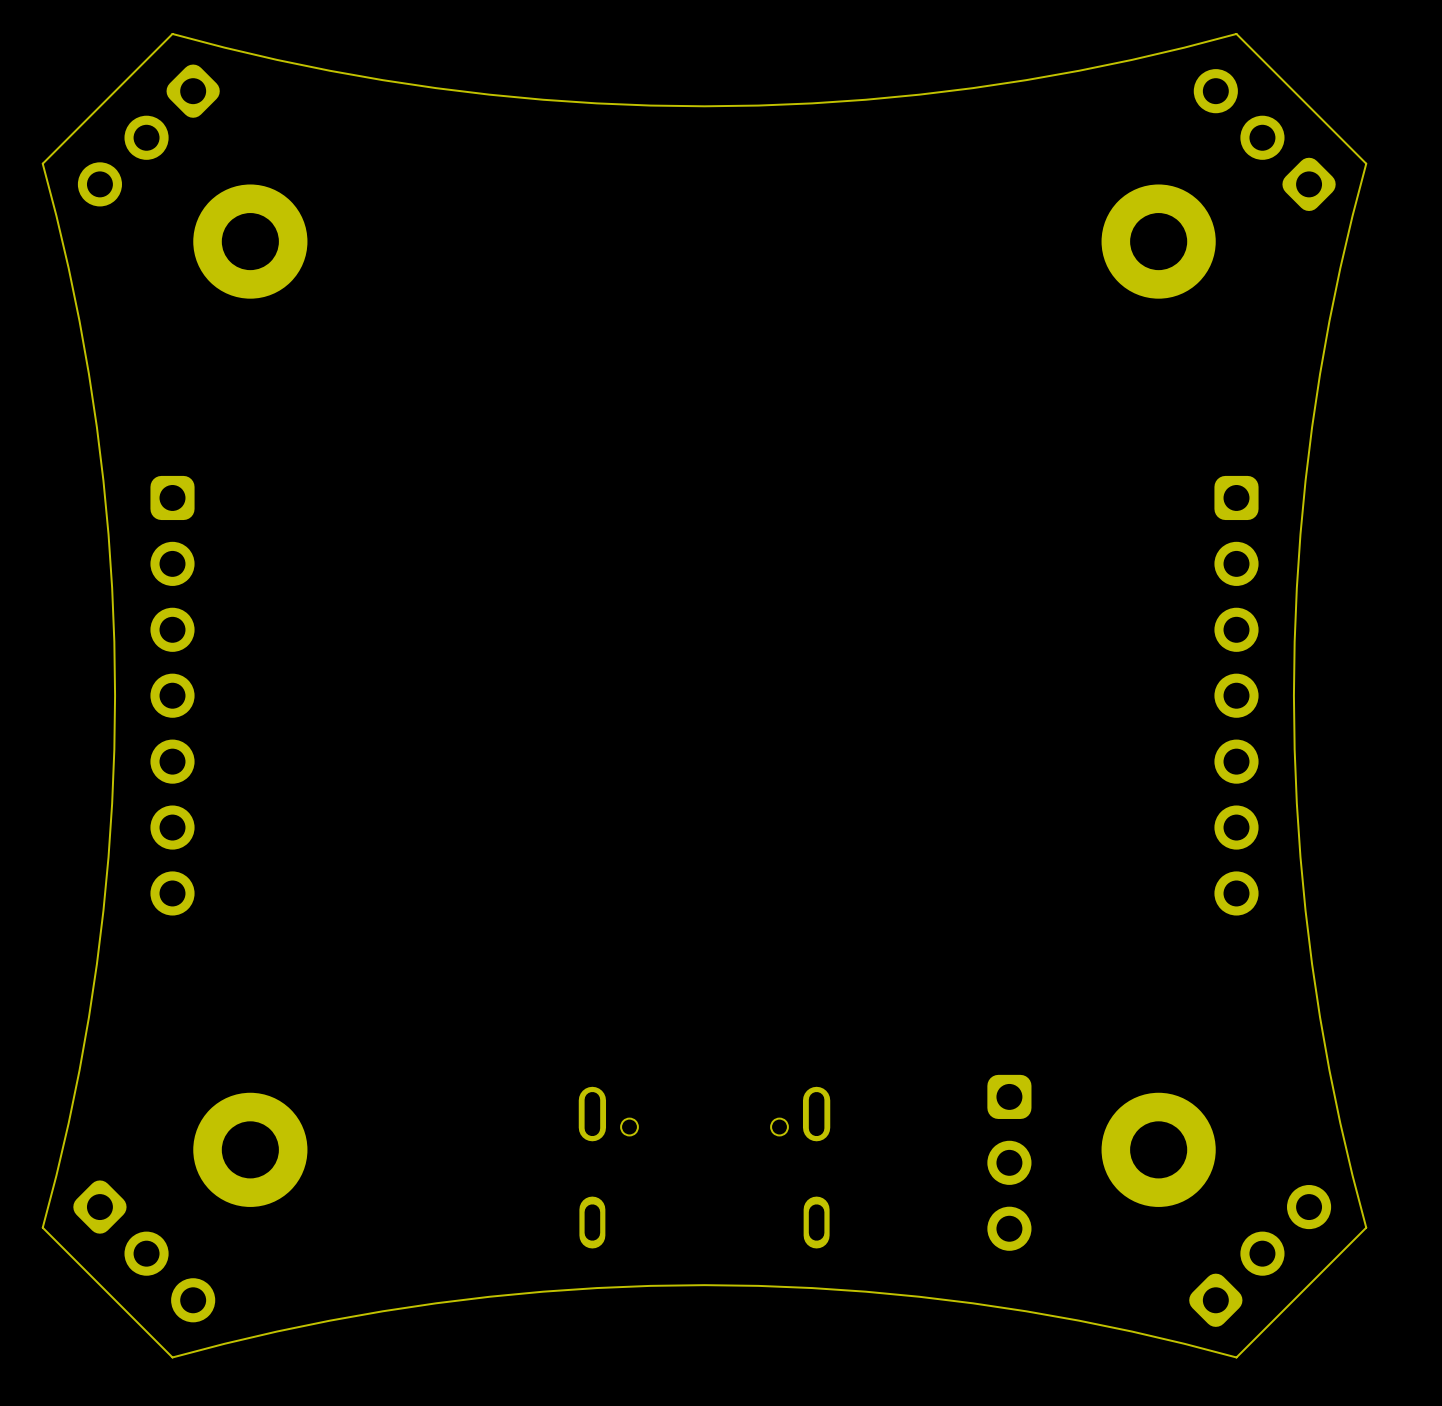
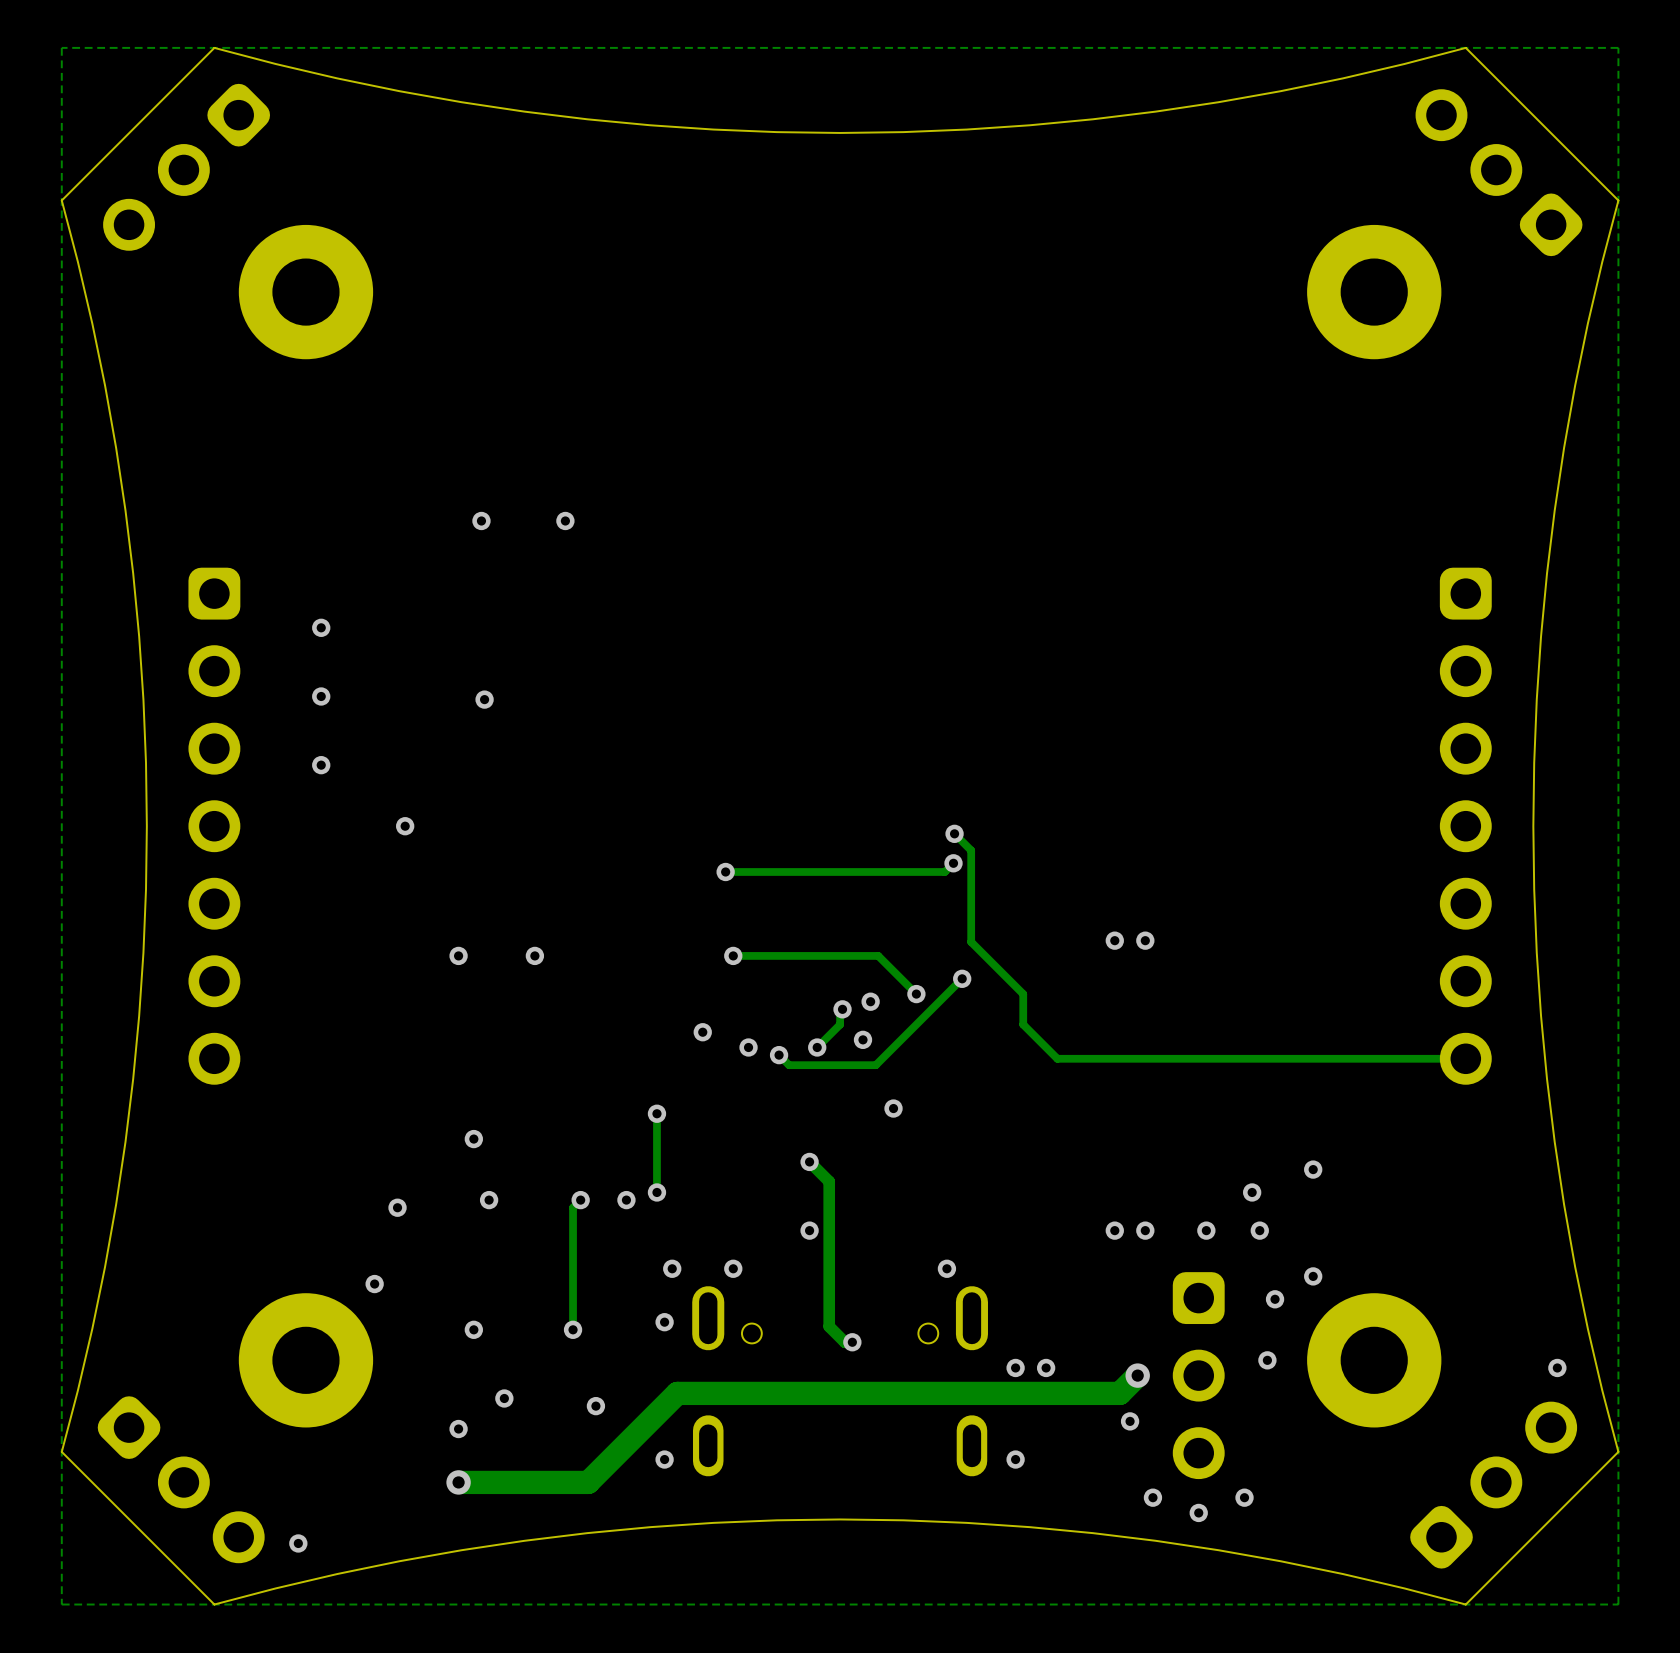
zone outline: none -> (1618, 47) (1618, 1604) (61, 1604) (61, 47) (1618, 47)
via: none -> (481, 520)
via: none -> (565, 520)
via: none -> (321, 627)
via: none -> (321, 696)
via: none -> (484, 699)
via: none -> (321, 765)
via: none -> (405, 826)
track: none -> (954, 833) (971, 850) (971, 942) (1023, 994) (1023, 1024) (1057, 1058) (1465, 1058)
via: none -> (954, 833)
track: none -> (953, 863) (944, 871) (725, 871)
via: none -> (953, 863)
via: none -> (725, 871)
via: none -> (1114, 940)
via: none -> (1145, 940)
via: none -> (458, 955)
via: none -> (534, 955)
track: none -> (733, 955) (878, 955) (916, 994)
via: none -> (733, 955)
track: none -> (962, 978) (875, 1065) (789, 1065) (779, 1055)
via: none -> (962, 978)
via: none -> (916, 994)
via: none -> (870, 1001)
track: none -> (842, 1009) (840, 1011) (840, 1024) (817, 1047)
via: none -> (842, 1009)
via: none -> (702, 1032)
via: none -> (862, 1039)
via: none -> (748, 1047)
via: none -> (817, 1047)
via: none -> (779, 1055)
via: none -> (893, 1108)
track: none -> (656, 1113) (656, 1192)
via: none -> (656, 1113)
via: none -> (473, 1139)
track: none -> (809, 1161) (829, 1181) (829, 1326) (844, 1342) (852, 1342)
via: none -> (809, 1161)
via: none -> (1313, 1169)
via: none -> (656, 1192)
via: none -> (1252, 1192)
via: none -> (489, 1200)
track: none -> (580, 1200) (573, 1207) (573, 1329)
via: none -> (580, 1200)
via: none -> (626, 1200)
via: none -> (397, 1207)
via: none -> (809, 1230)
via: none -> (1114, 1230)
via: none -> (1145, 1230)
via: none -> (1206, 1230)
via: none -> (1259, 1230)
via: none -> (672, 1268)
via: none -> (733, 1268)
via: none -> (946, 1268)
via: none -> (1313, 1276)
via: none -> (374, 1284)
via: none -> (1275, 1299)
via: none -> (664, 1322)
via: none -> (473, 1329)
via: none -> (573, 1329)
via: none -> (852, 1342)
via: none -> (1267, 1360)
via: none -> (1015, 1367)
via: none -> (1046, 1367)
via: none -> (1557, 1367)
track: none -> (1137, 1375) (1119, 1393) (677, 1393) (588, 1482) (458, 1482)
via: none -> (1137, 1375)
via: none -> (504, 1398)
via: none -> (595, 1406)
via: none -> (1130, 1421)
via: none -> (458, 1429)
via: none -> (664, 1459)
via: none -> (1015, 1459)
via: none -> (458, 1482)
via: none -> (1152, 1497)
via: none -> (1244, 1497)
via: none -> (1198, 1512)
via: none -> (298, 1543)

